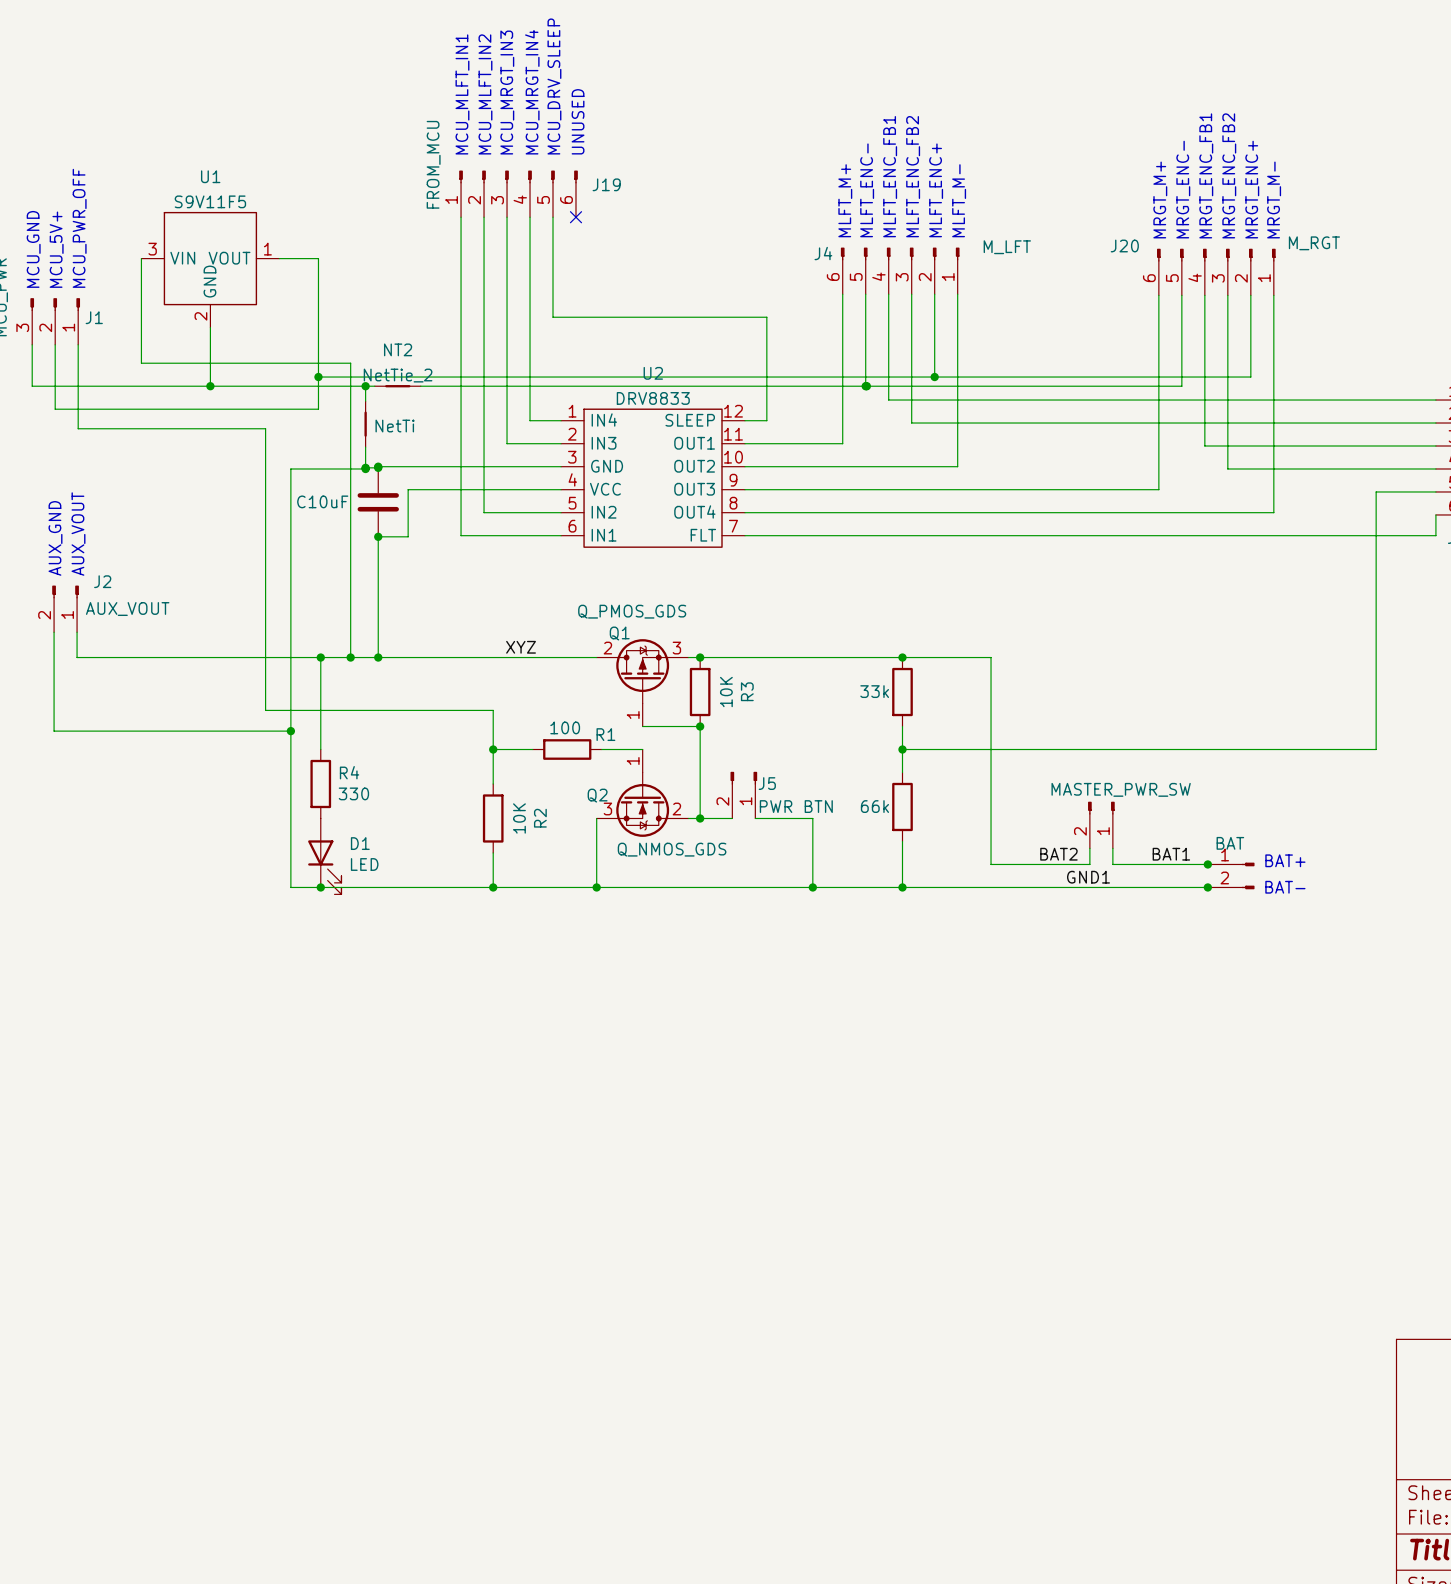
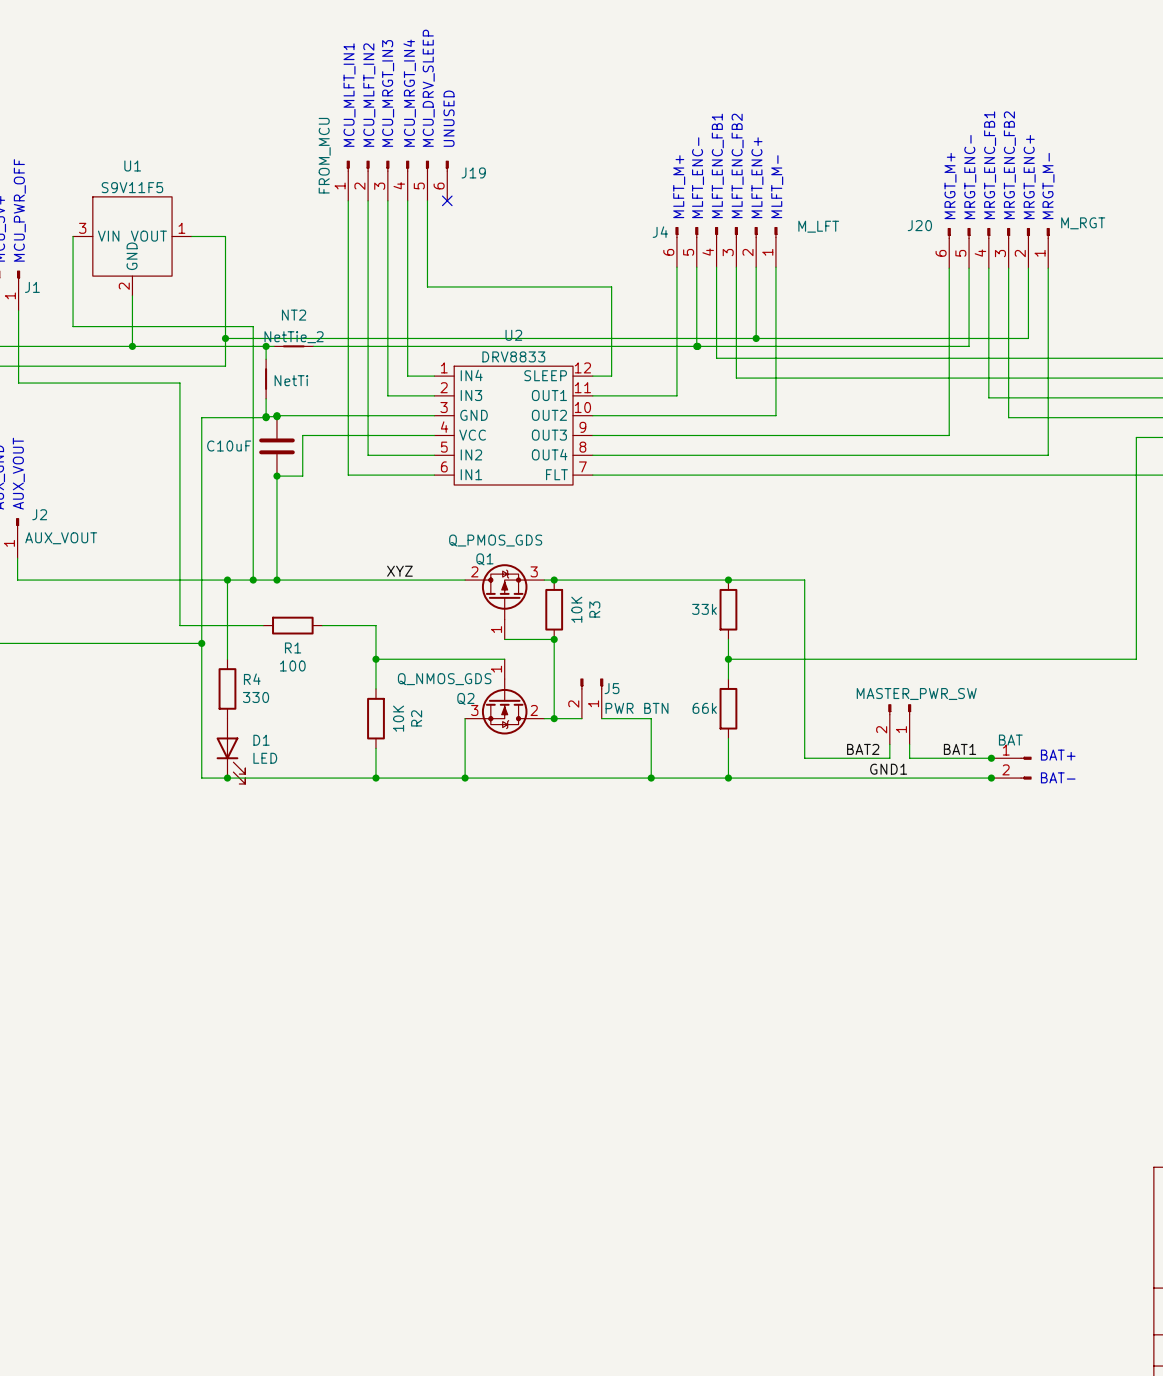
wire: (362, 710) (431, 710) -> (410, 659) (469, 659)
R1 value position: 100 (565, 727) -> 100 (292, 666)
R1 name position: R1 (605, 734) -> R1 (293, 647)
R1 position: (567, 749) -> (292, 625)
Q2 value position: Q_NMOS_GDS (672, 849) -> Q_NMOS_GDS (444, 679)

